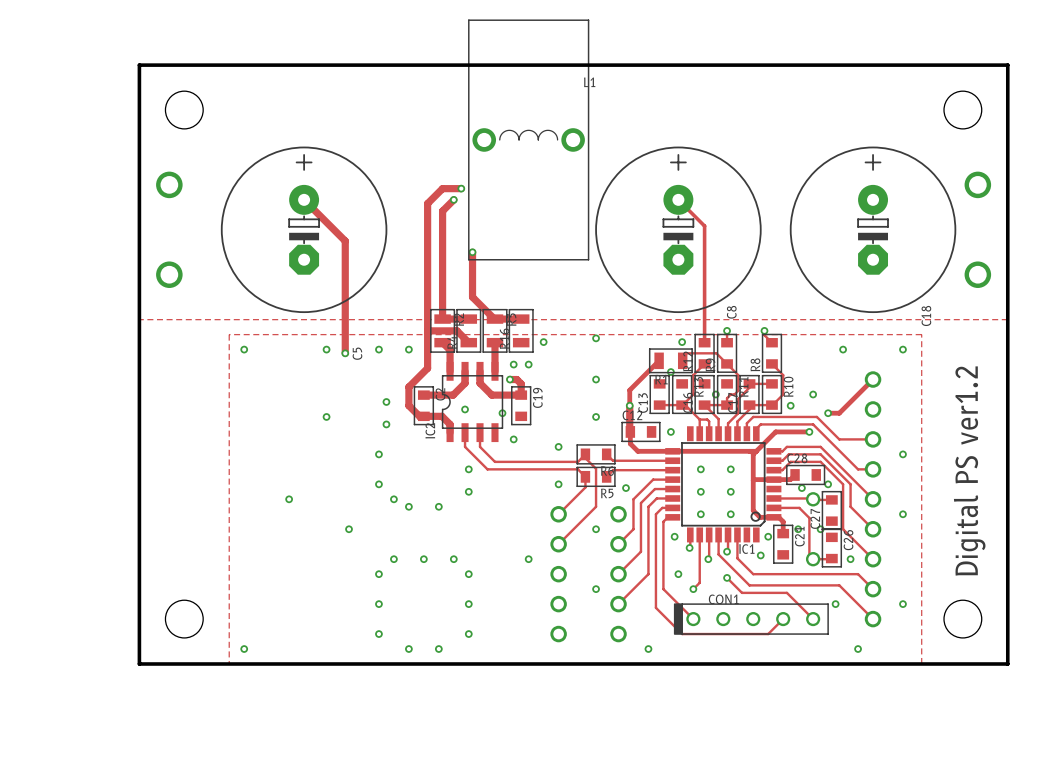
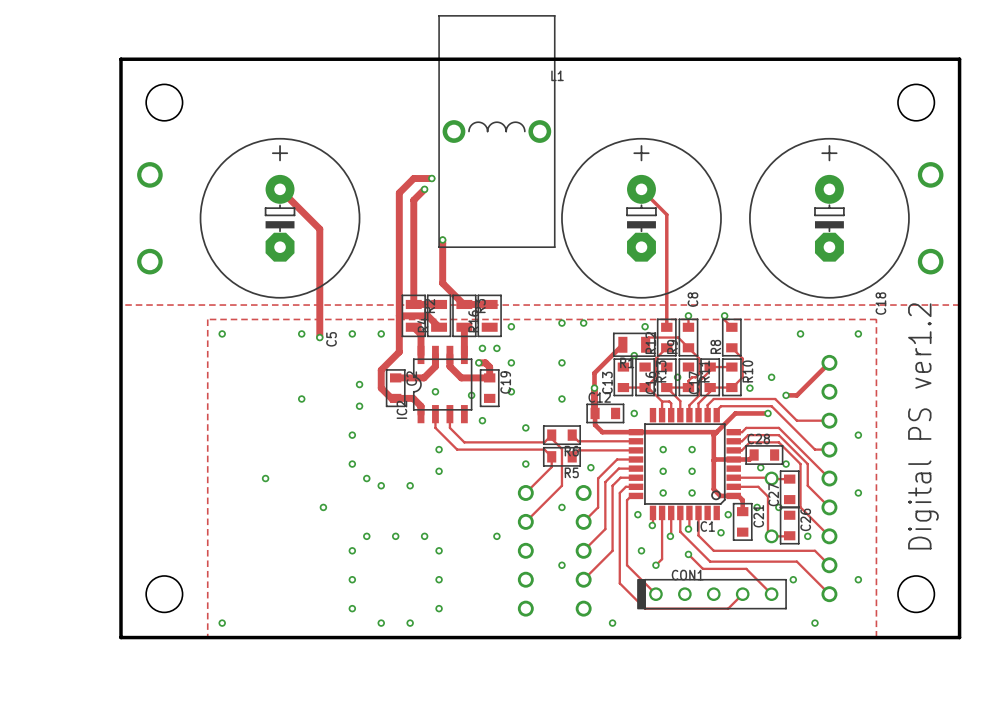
via: none -> (583, 323)
via: none -> (511, 362)
via: none -> (511, 391)

